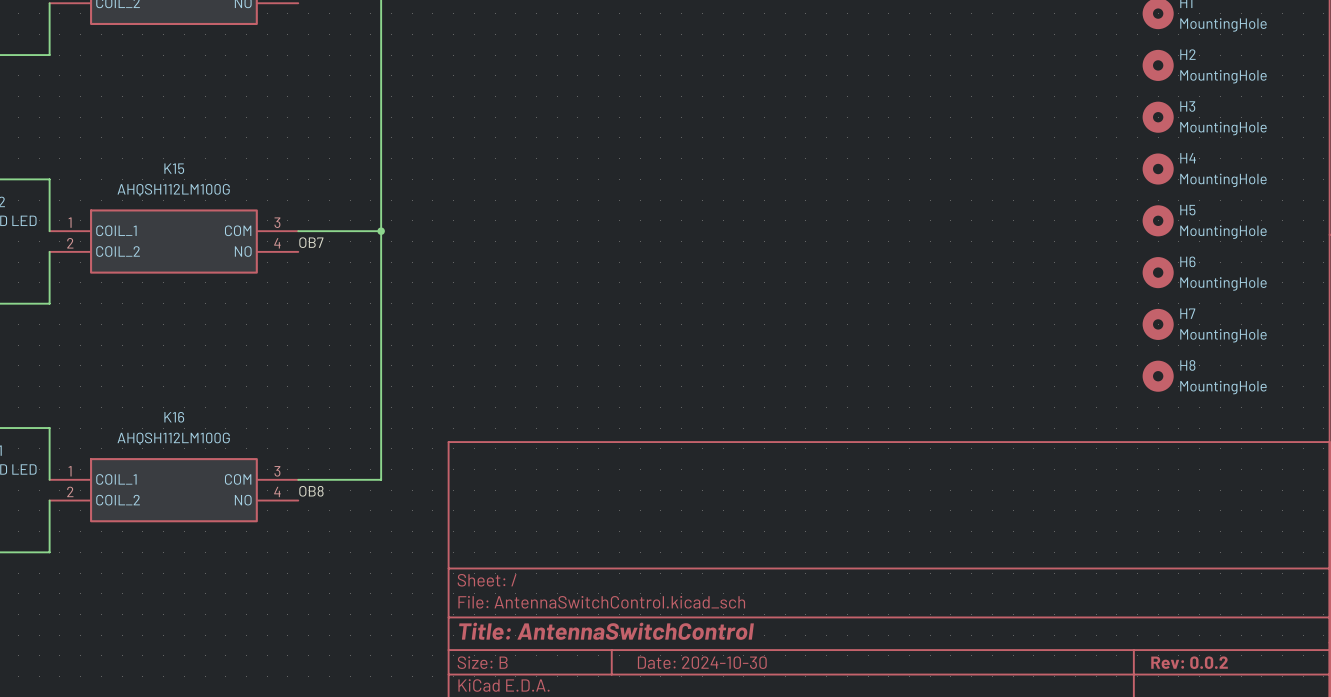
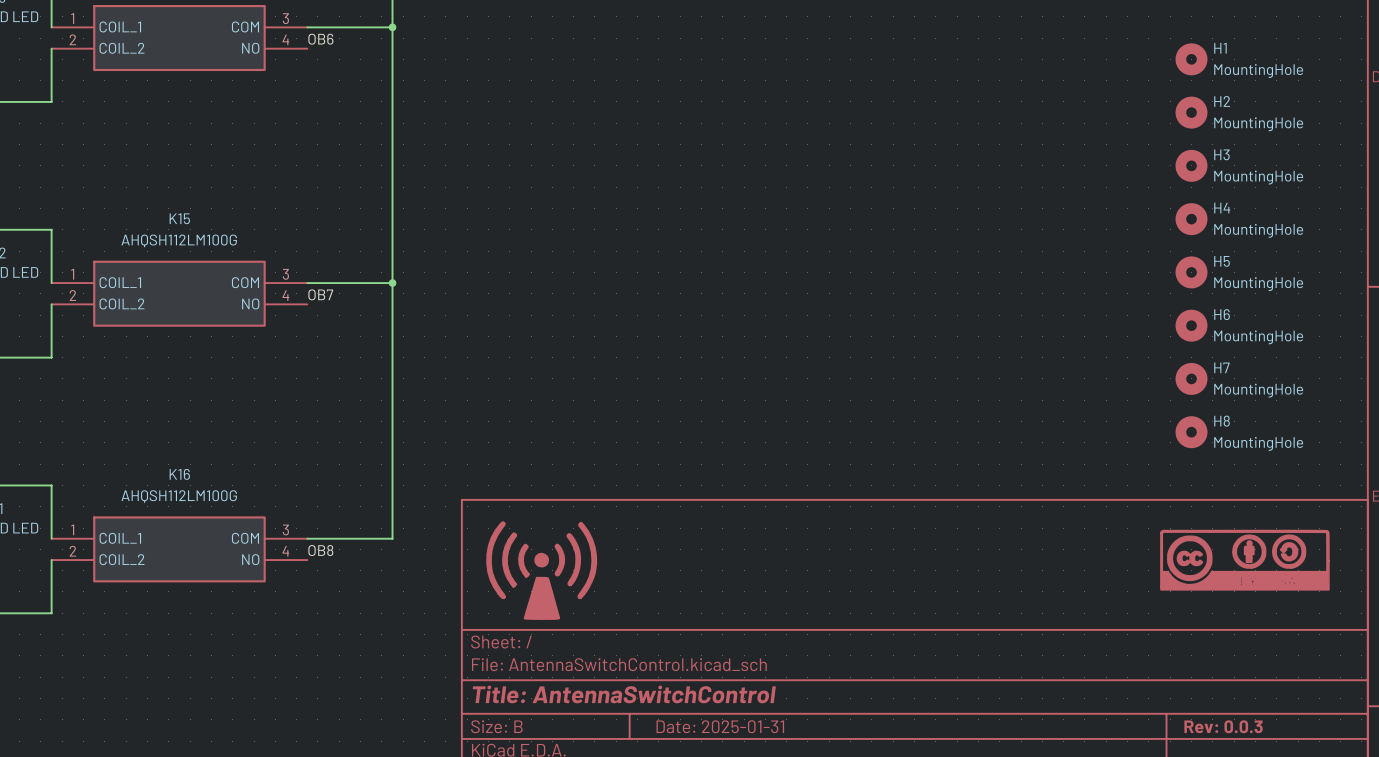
power symbol: none -> (1244, 560)
power symbol: none -> (541, 570)
title block: Date: 2024-10-30 (702, 662) -> Date: 2025-01-31 (720, 726)
title block: Rev: 0.0.2 (1189, 662) -> Rev: 0.0.3 (1223, 726)

